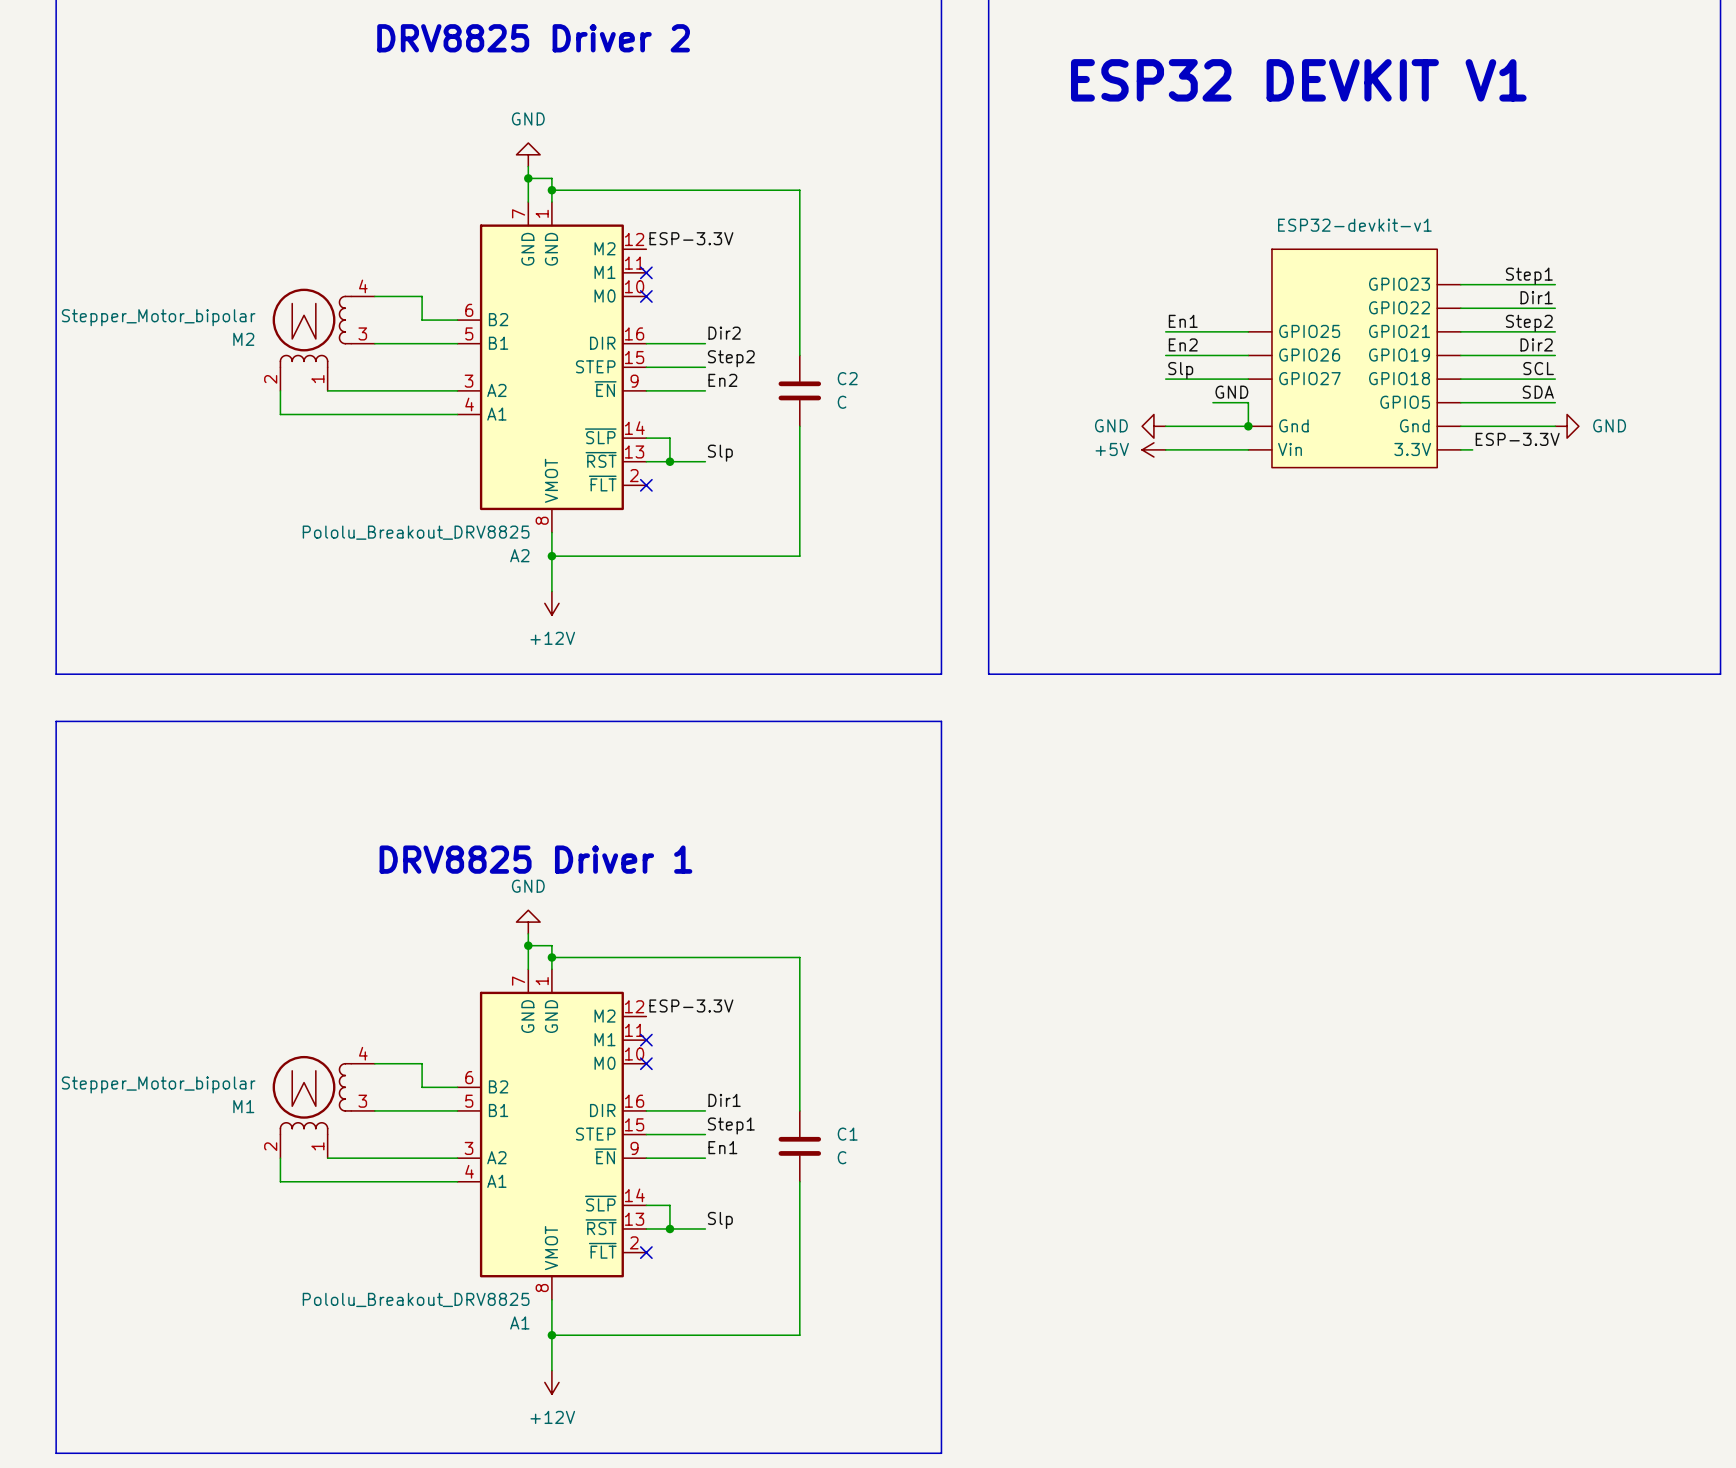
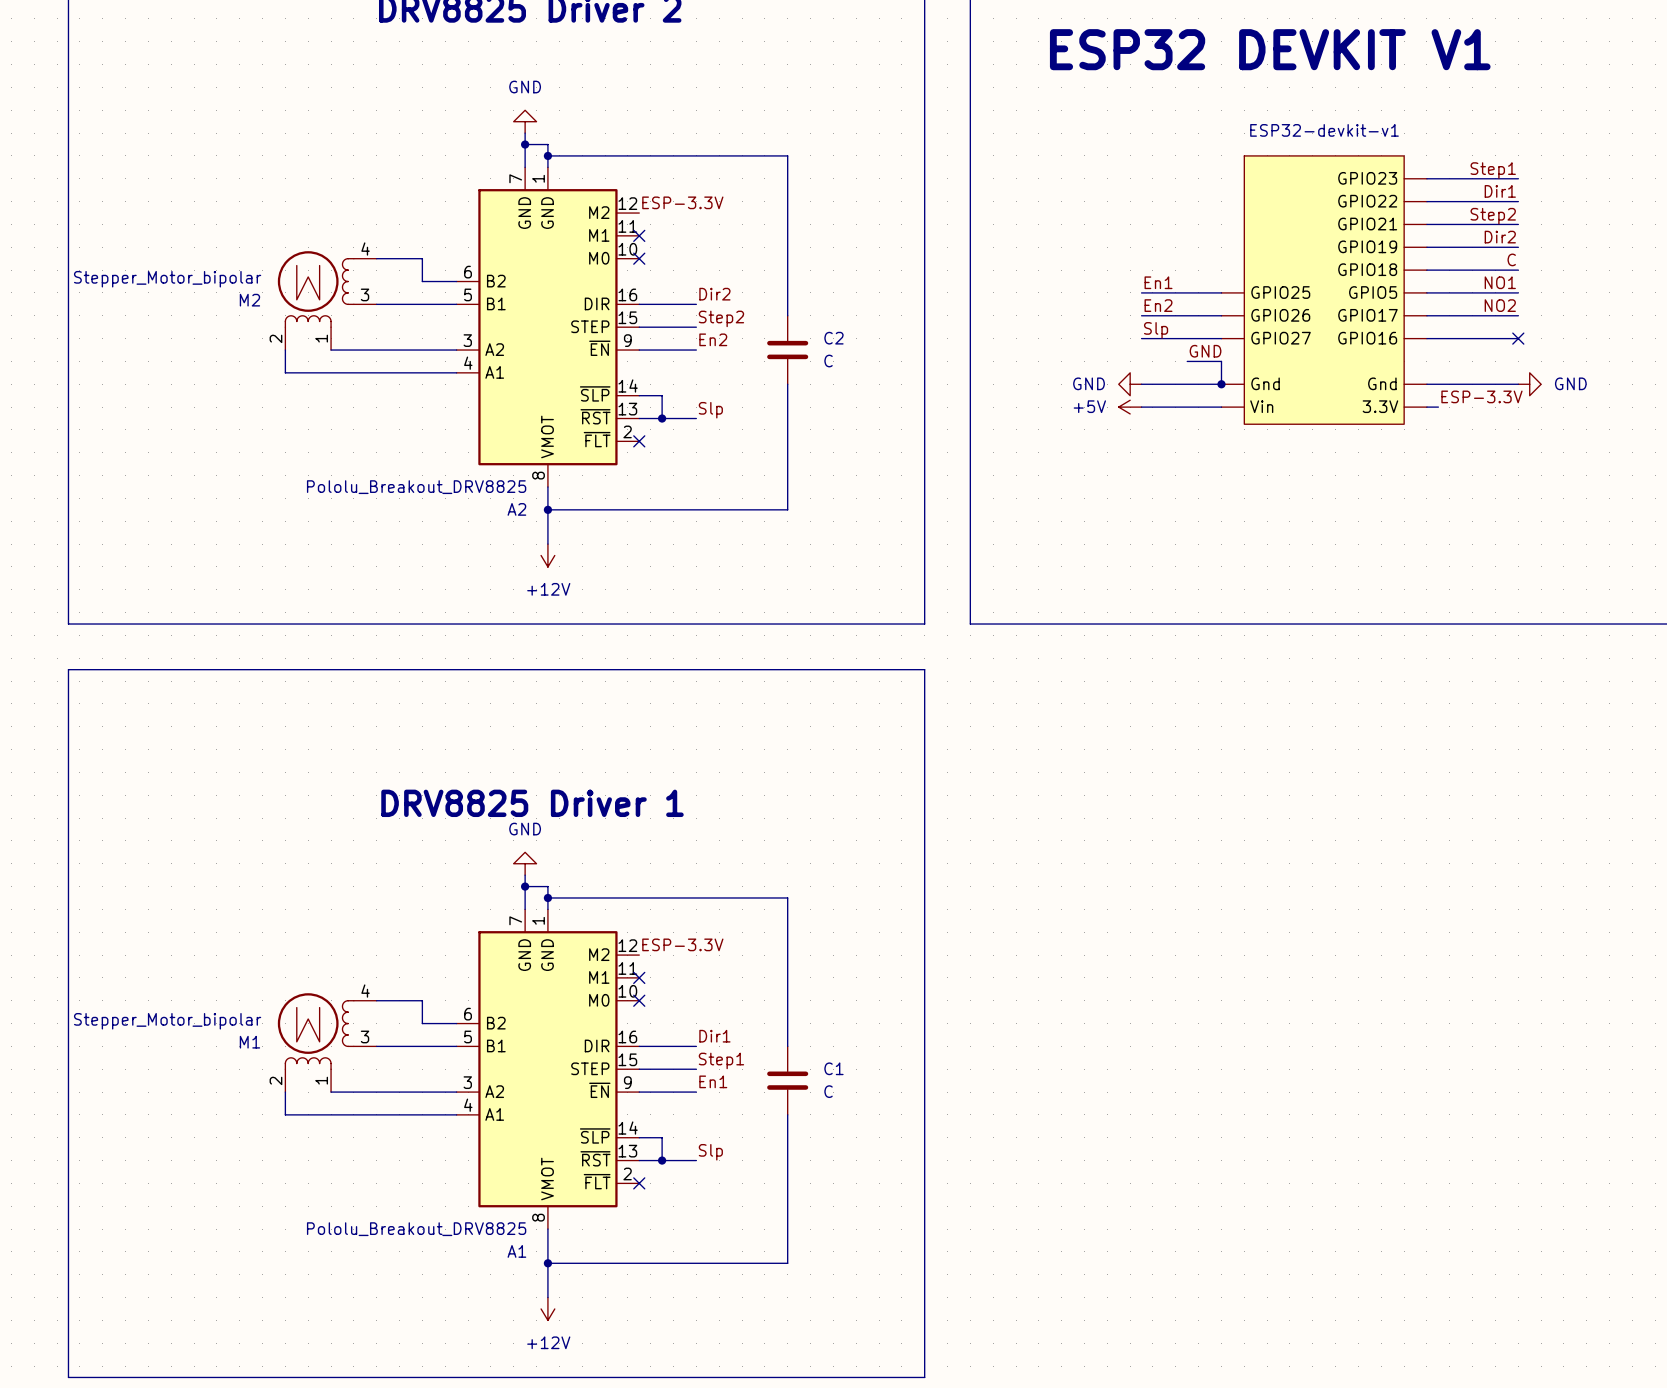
label: none -> Step1 (1493, 170)
wire: none -> (1426, 178) (1518, 178)
ESP32-devkit-v1 name position: ESP32-devkit-v1 (1354, 225) -> ESP32-devkit-v1 (1324, 130)
label: none -> Dir1 (1500, 191)
wire: none -> (1426, 201) (1518, 201)
ESP32-devkit-v1 symbol: [1248, 249, 1461, 468] -> [1221, 155, 1427, 425]
label: none -> Step2 (1493, 216)
label: Step1 (1529, 276) -> Dir2 (1500, 237)
label: Dir1 (1536, 297) -> C (1511, 259)
label: Step2 (1529, 323) -> NO1 (1500, 282)
label: Dir2 (1536, 344) -> NO2 (1500, 305)
label: SCL (1538, 368) -> none
no-connect mark: none -> (1518, 338)
label: SDA (1538, 392) -> none
wire: (1460, 402) (1555, 402) -> (1426, 224) (1518, 224)

